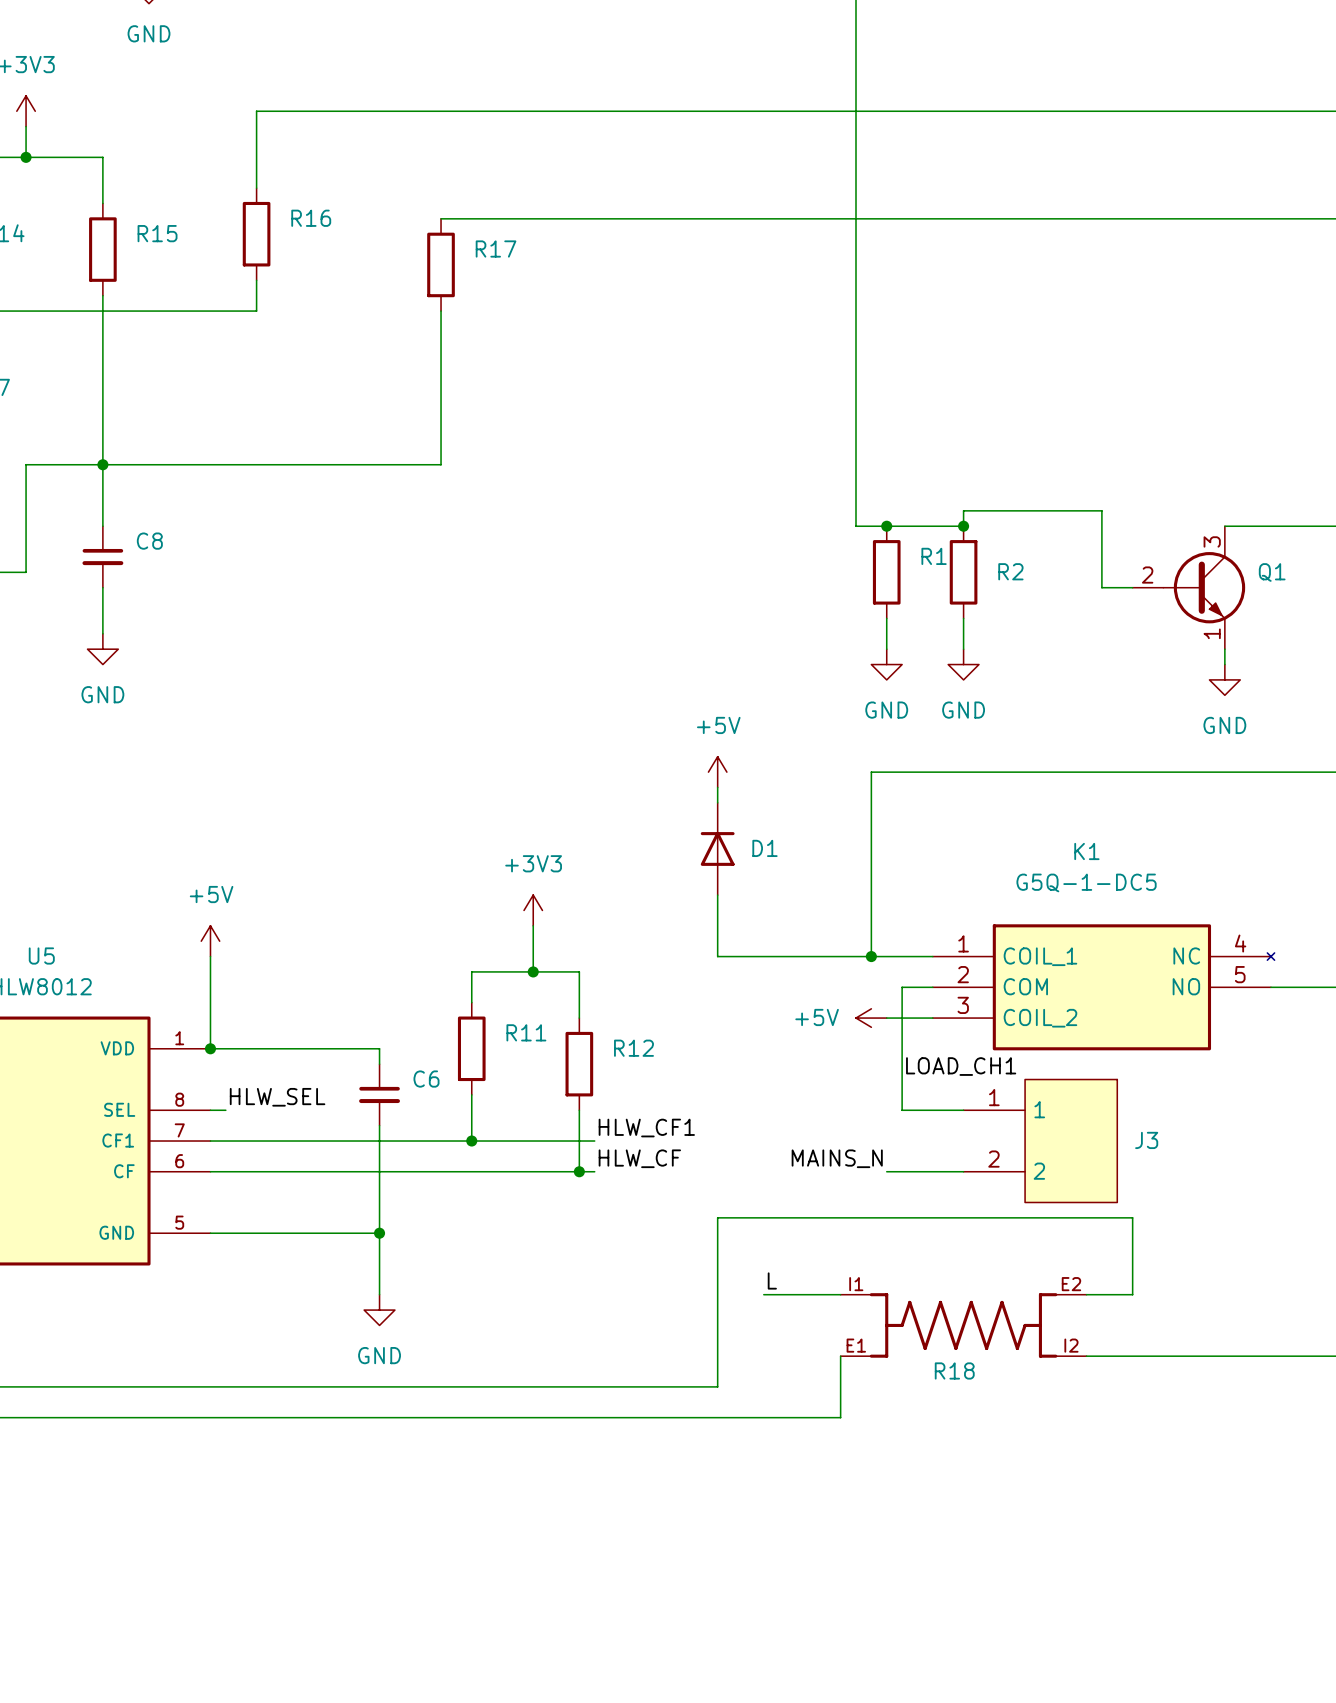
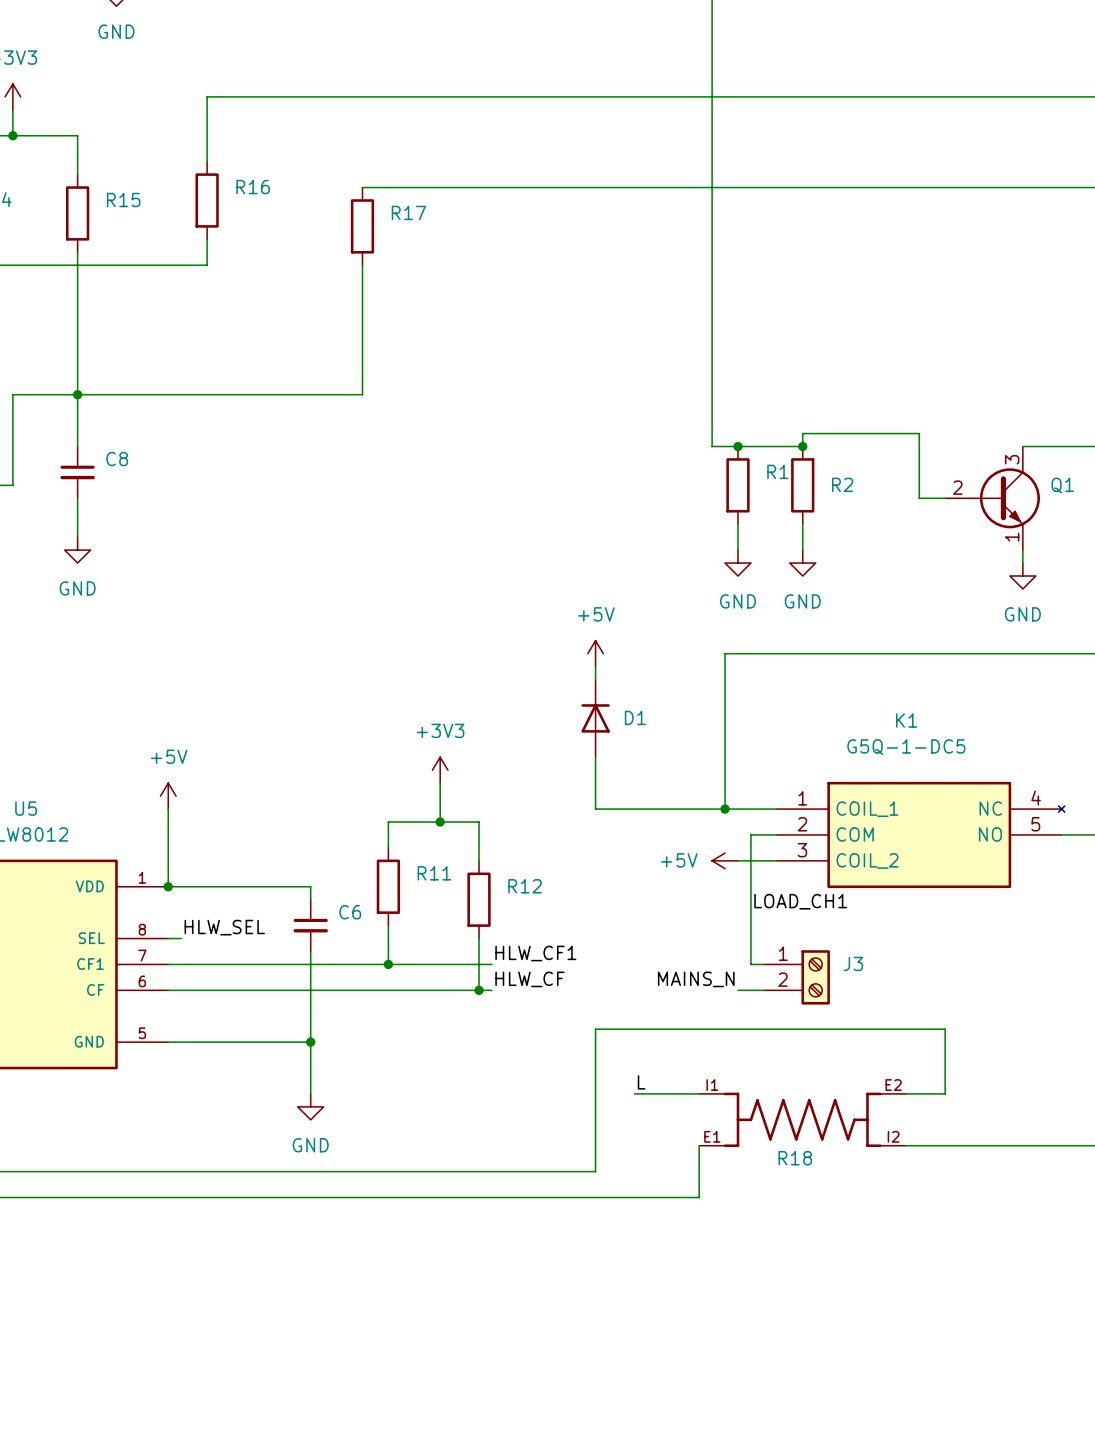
J3 symbol: [963, 1079, 1118, 1203] -> [763, 950, 830, 1005]
wire: (902, 1110) (963, 1110) -> (750, 938) (750, 964) (763, 964)
J3 name position: J3 (1146, 1140) -> J3 (853, 963)

